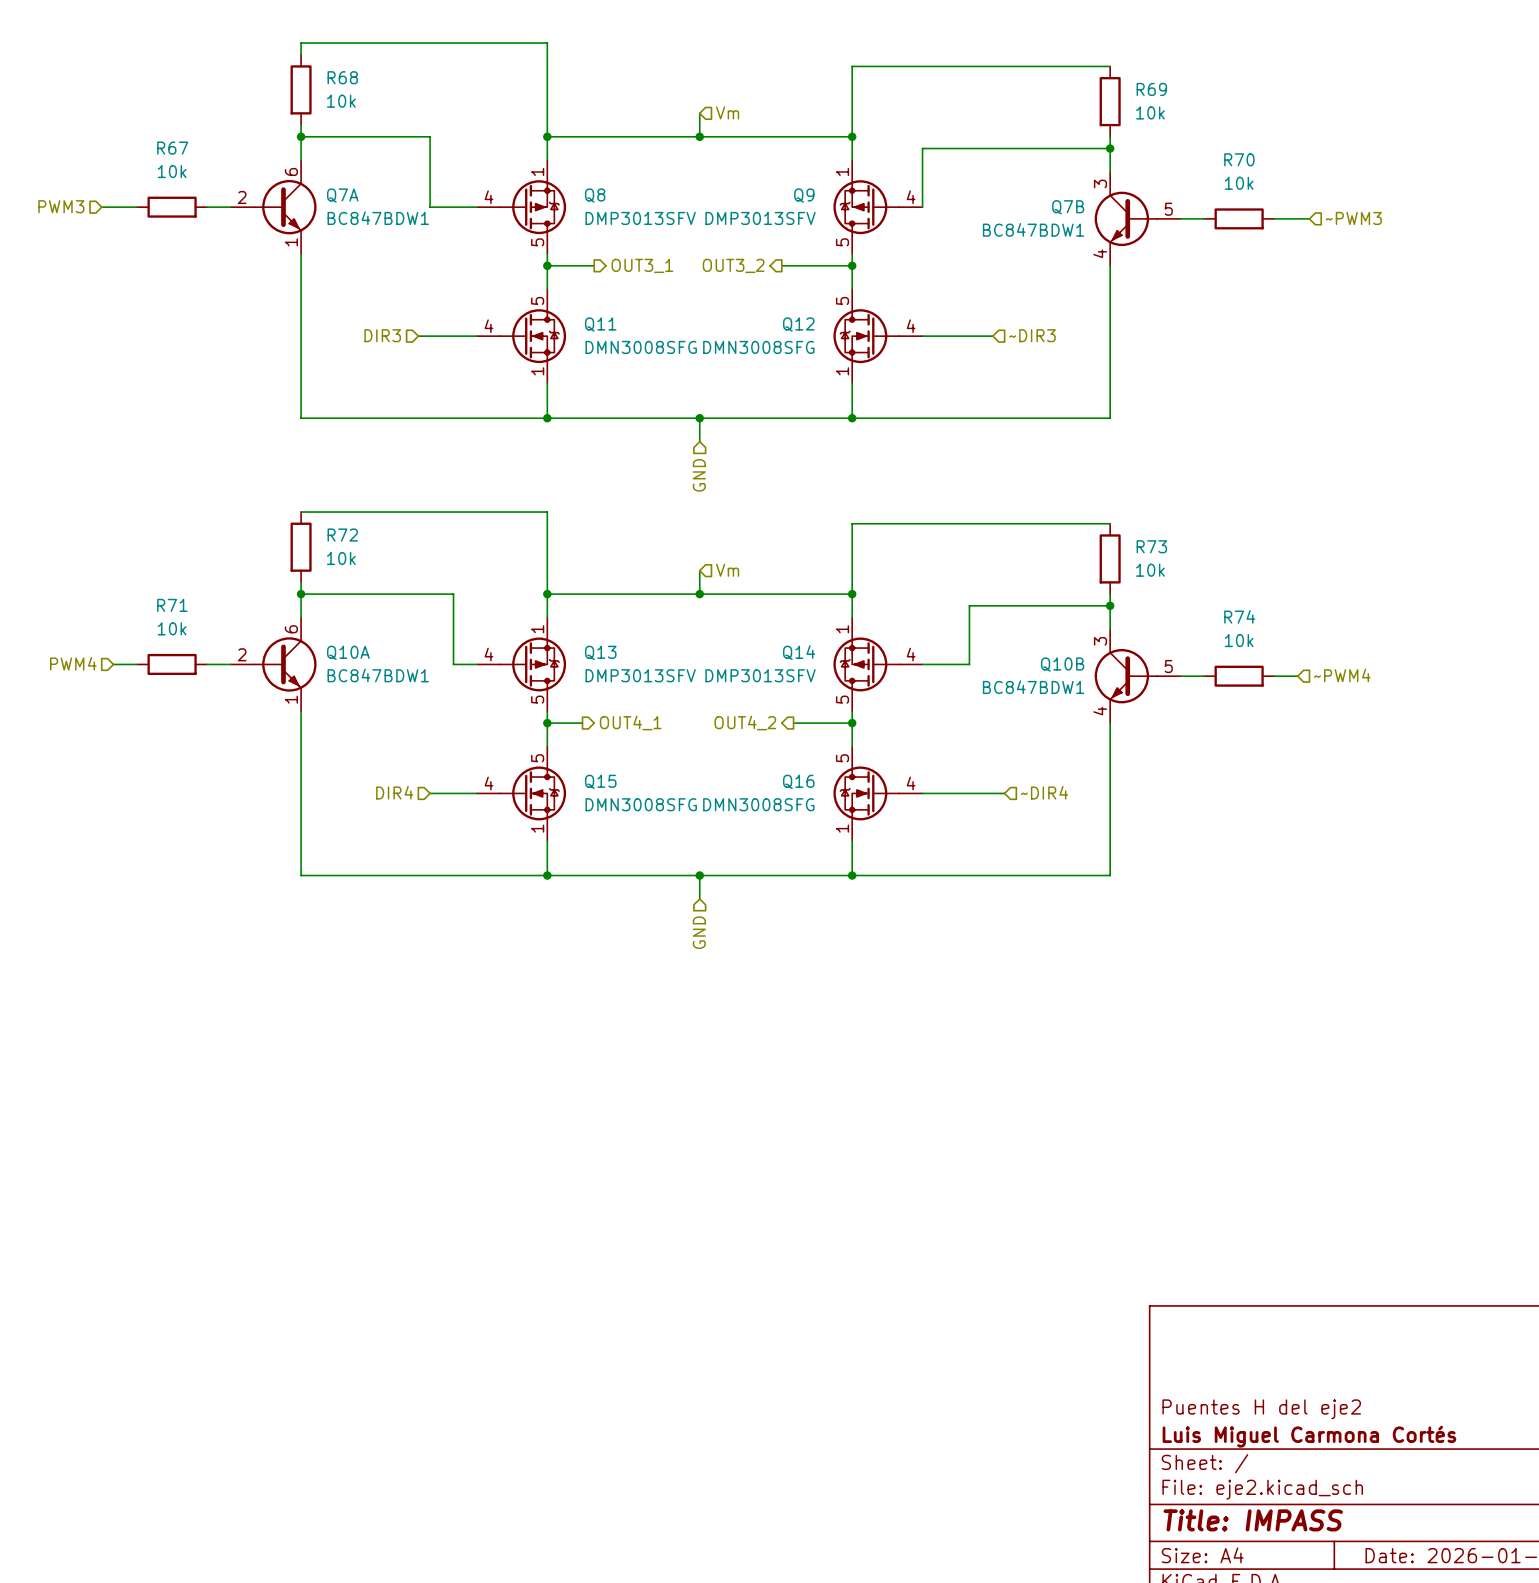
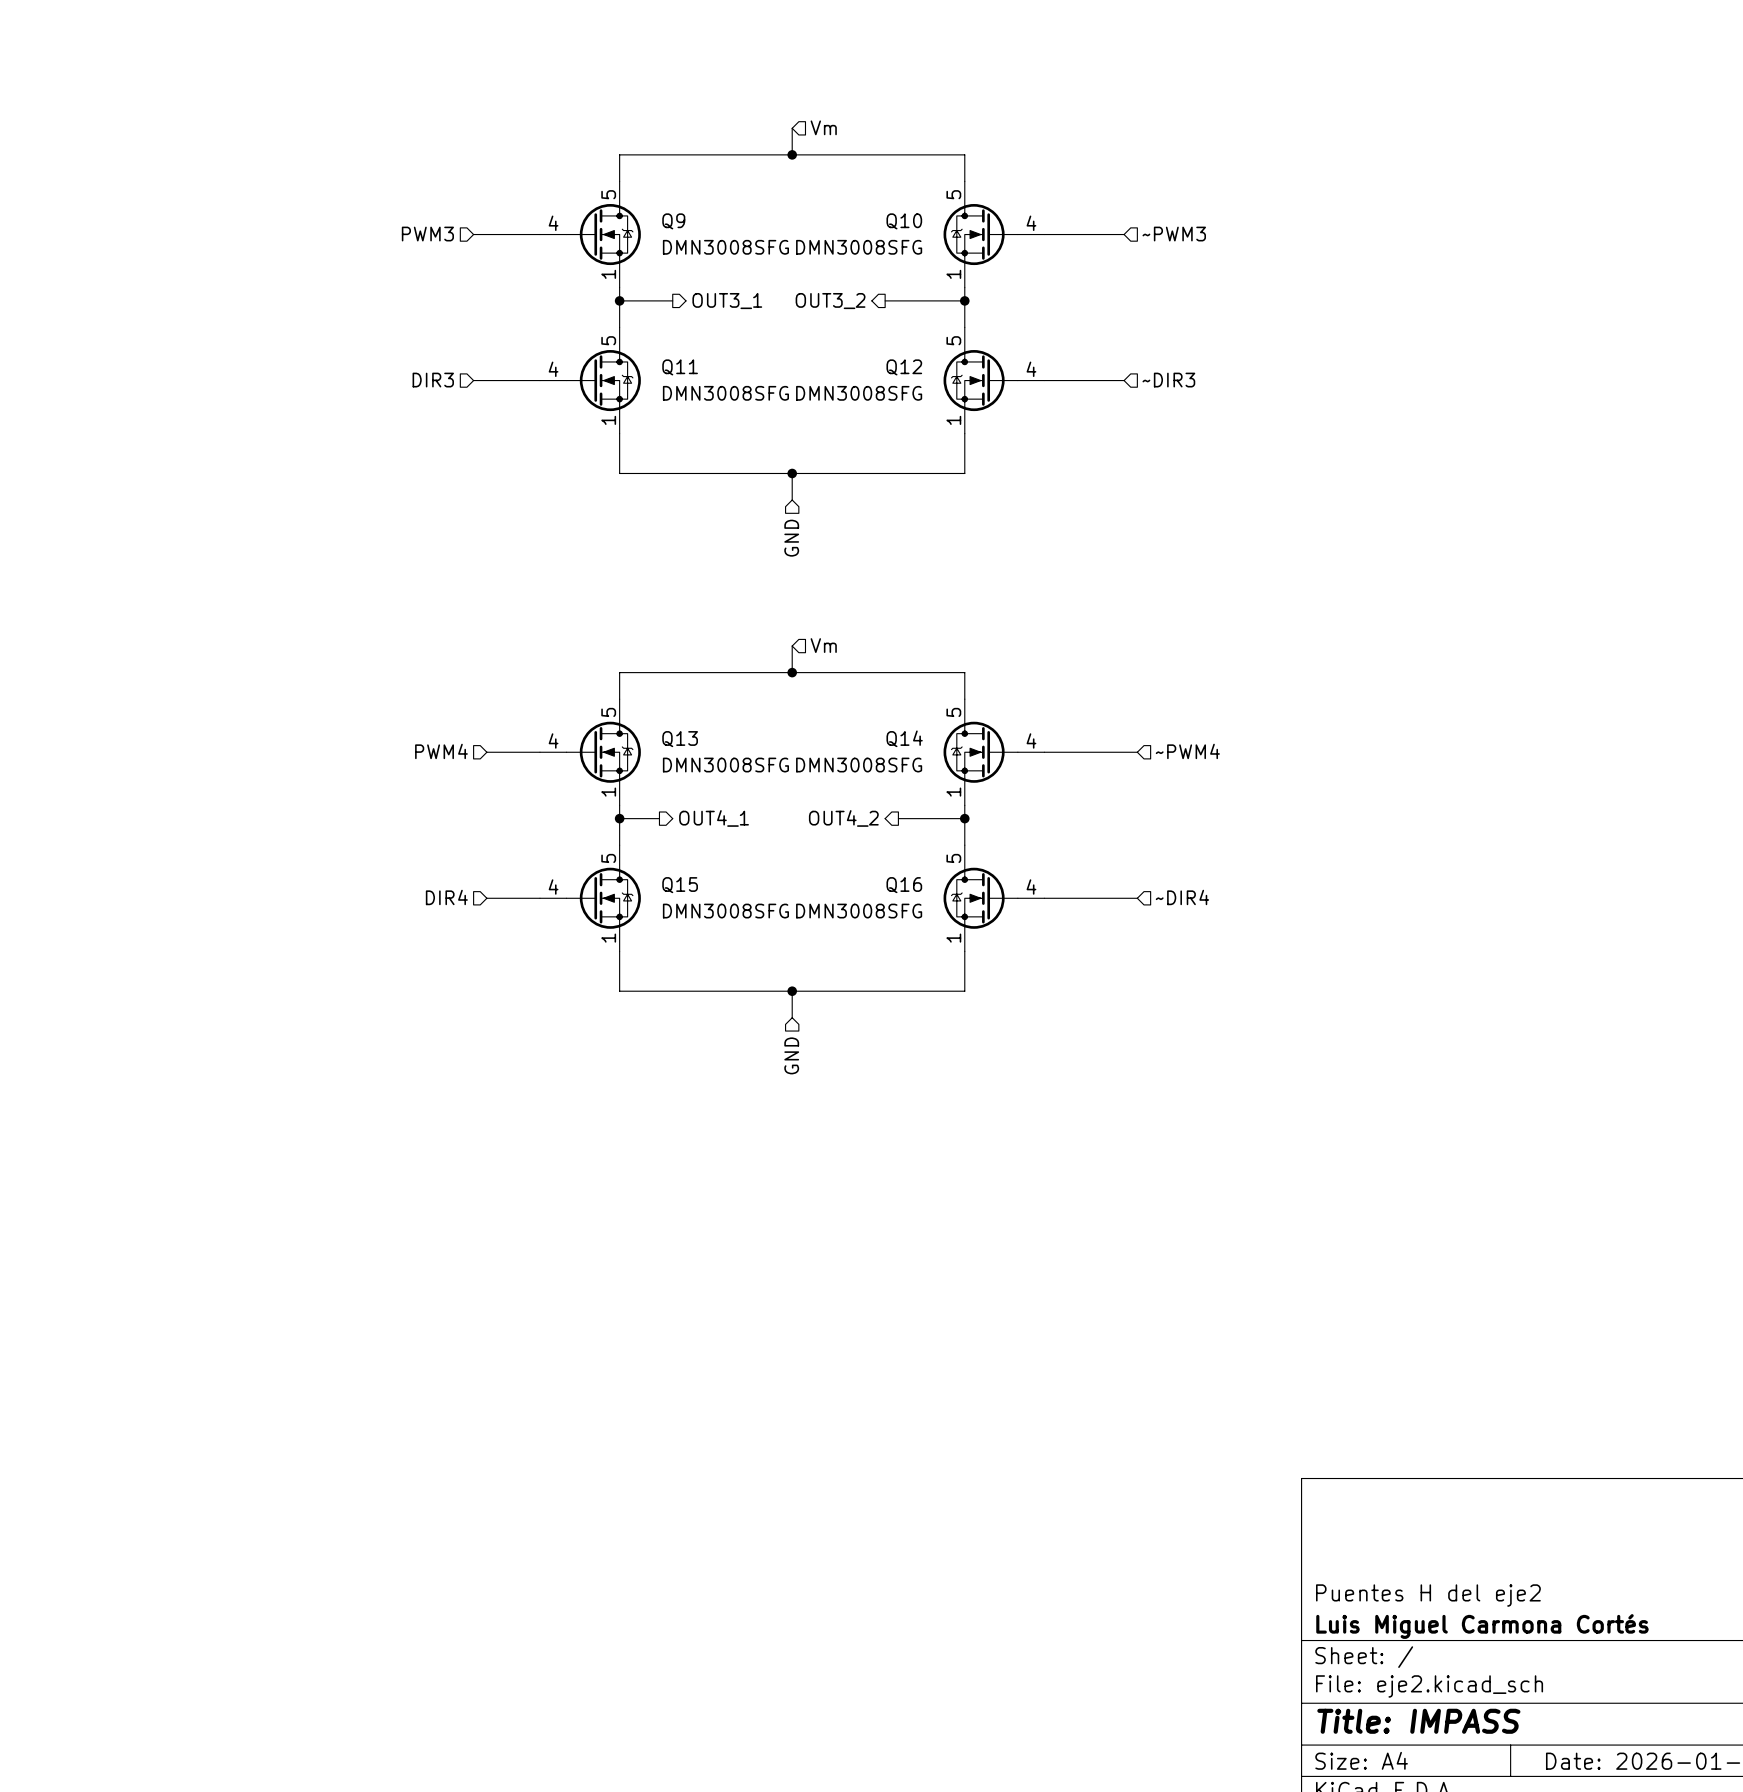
wire: (301, 54) (301, 43) (547, 43) (547, 136) -> none
wire: (1110, 66) (852, 66) (852, 136) -> none
R68: 10k (301, 89) -> none
R69: 10k (1110, 101) -> none
wire: (301, 125) (301, 160) -> none
wire: (301, 136) (430, 136) (430, 207) -> (473, 234) (486, 234)
junction: (301, 136) -> none
junction: (547, 136) -> none
junction: (852, 136) -> none
wire: (1110, 136) (1110, 171) -> none
wire: (1110, 148) (922, 148) (922, 207) -> (1124, 234) (1044, 234)
junction: (1110, 148) -> none
Q9 symbol: [833, 160, 923, 255] -> [539, 181, 641, 288]
Q9 name position: Q9 (804, 195) -> Q9 (673, 221)
hierarchical label: PWM3 (61, 206) -> none
hierarchical label: none -> PWM3 (427, 234)
hierarchical label: none -> ~PWM3 (1174, 234)
wire: (101, 207) (136, 207) -> none
R67: 10k (172, 207) -> none
wire: (207, 207) (230, 207) -> none
Q7A: BC847BDW1 (273, 207) -> none
Q8: DMP3013SFV (521, 207) -> none
Q10: none -> DMN3008SFG (993, 234)
Q9 value: DMP3013SFV (760, 218) -> DMN3008SFG (725, 247)
Q7B: BC847BDW1 (1137, 218) -> none
wire: (1180, 218) (1203, 218) -> none
R70: 10k (1239, 218) -> none
wire: (1274, 218) (1309, 218) -> none
hierarchical label: ~PWM3 (1353, 218) -> none
wire: (301, 254) (301, 418) (547, 418) -> none
wire: (1110, 265) (1110, 418) (852, 418) -> none
junction: (547, 418) -> none
junction: (852, 418) -> none
wire: (301, 512) (547, 512) (547, 594) -> none
wire: (1110, 523) (852, 523) (852, 594) -> none
R72: 10k (301, 547) -> none
R73: 10k (1110, 558) -> none
wire: (301, 582) (301, 617) -> none
wire: (301, 594) (453, 594) (453, 664) -> (486, 752) (513, 752)
junction: (301, 594) -> none
junction: (547, 594) -> none
junction: (852, 594) -> none
wire: (1110, 594) (1110, 629) -> none
wire: (1110, 605) (969, 605) (969, 664) -> (1137, 752) (1097, 752)
junction: (1110, 605) -> none
Q13 symbol: [476, 617, 567, 712] -> [539, 699, 641, 806]
Q14 symbol: [833, 617, 923, 712] -> [943, 699, 1045, 806]
hierarchical label: PWM4 (73, 663) -> none
hierarchical label: none -> PWM4 (441, 751)
hierarchical label: none -> ~PWM4 (1187, 751)
wire: (113, 664) (136, 664) -> none
R71: 10k (172, 664) -> none
wire: (207, 664) (230, 664) -> none
Q10A: BC847BDW1 (273, 664) -> none
Q13 value: DMP3013SFV (640, 675) -> DMN3008SFG (725, 765)
Q14 value: DMP3013SFV (760, 675) -> DMN3008SFG (859, 765)
hierarchical label: ~PWM4 (1342, 675) -> none
Q10B: BC847BDW1 (1137, 676) -> none
wire: (1180, 676) (1203, 676) -> none
R74: 10k (1239, 676) -> none
wire: (1274, 676) (1297, 676) -> none
wire: (301, 711) (301, 875) (547, 875) -> none
wire: (1110, 723) (1110, 875) (852, 875) -> none
junction: (547, 875) -> none
junction: (852, 875) -> none

